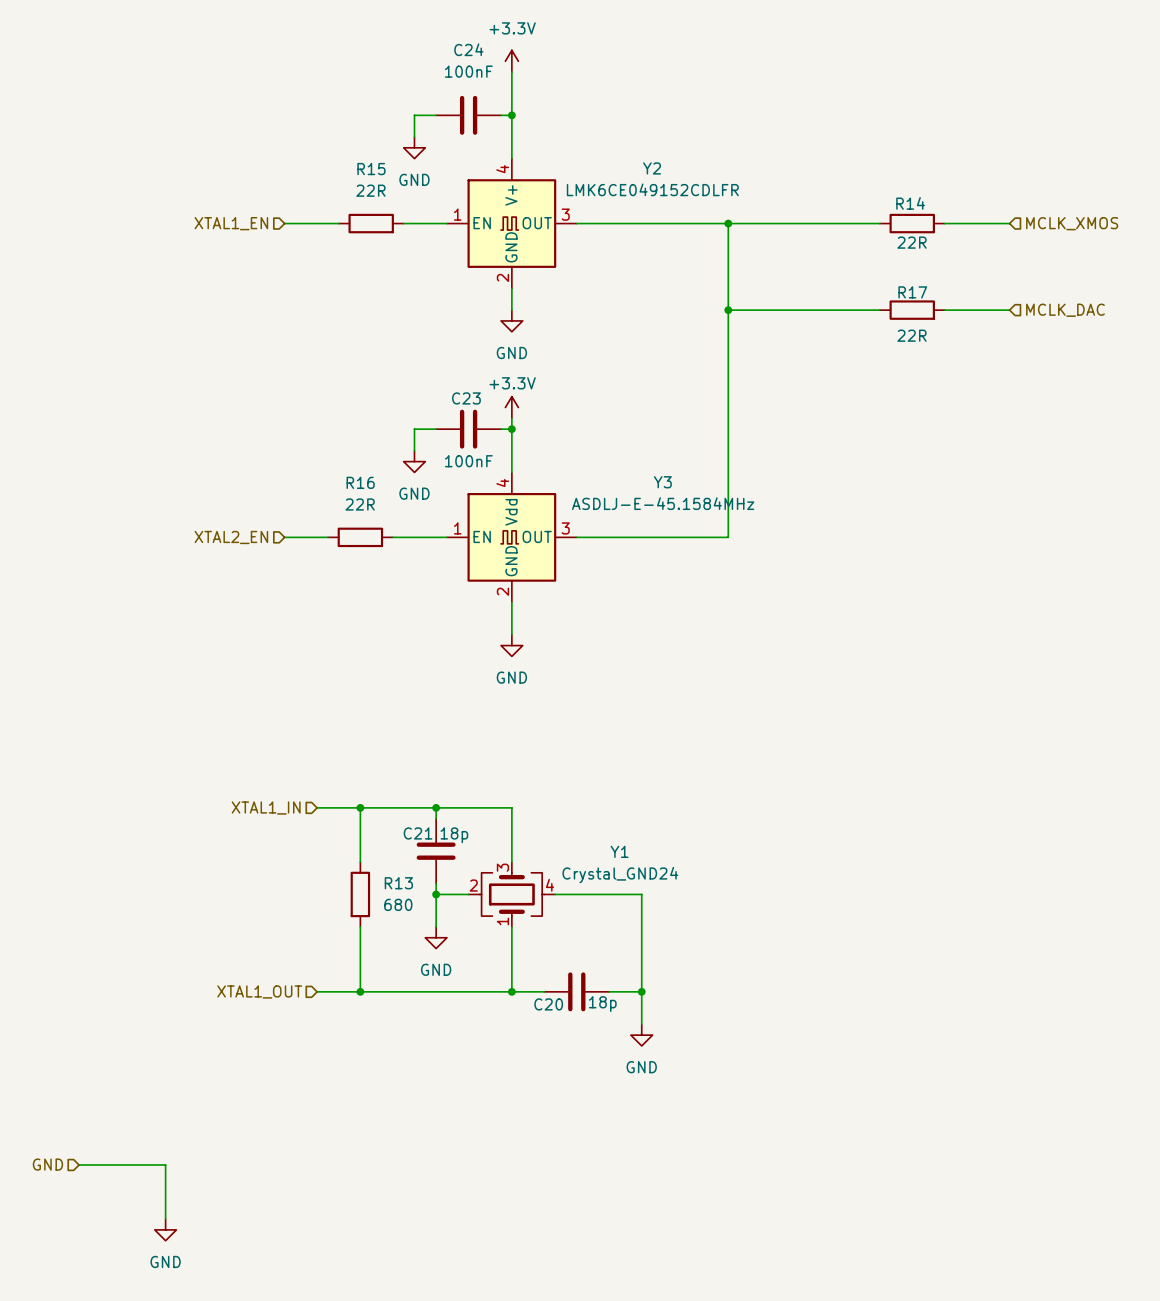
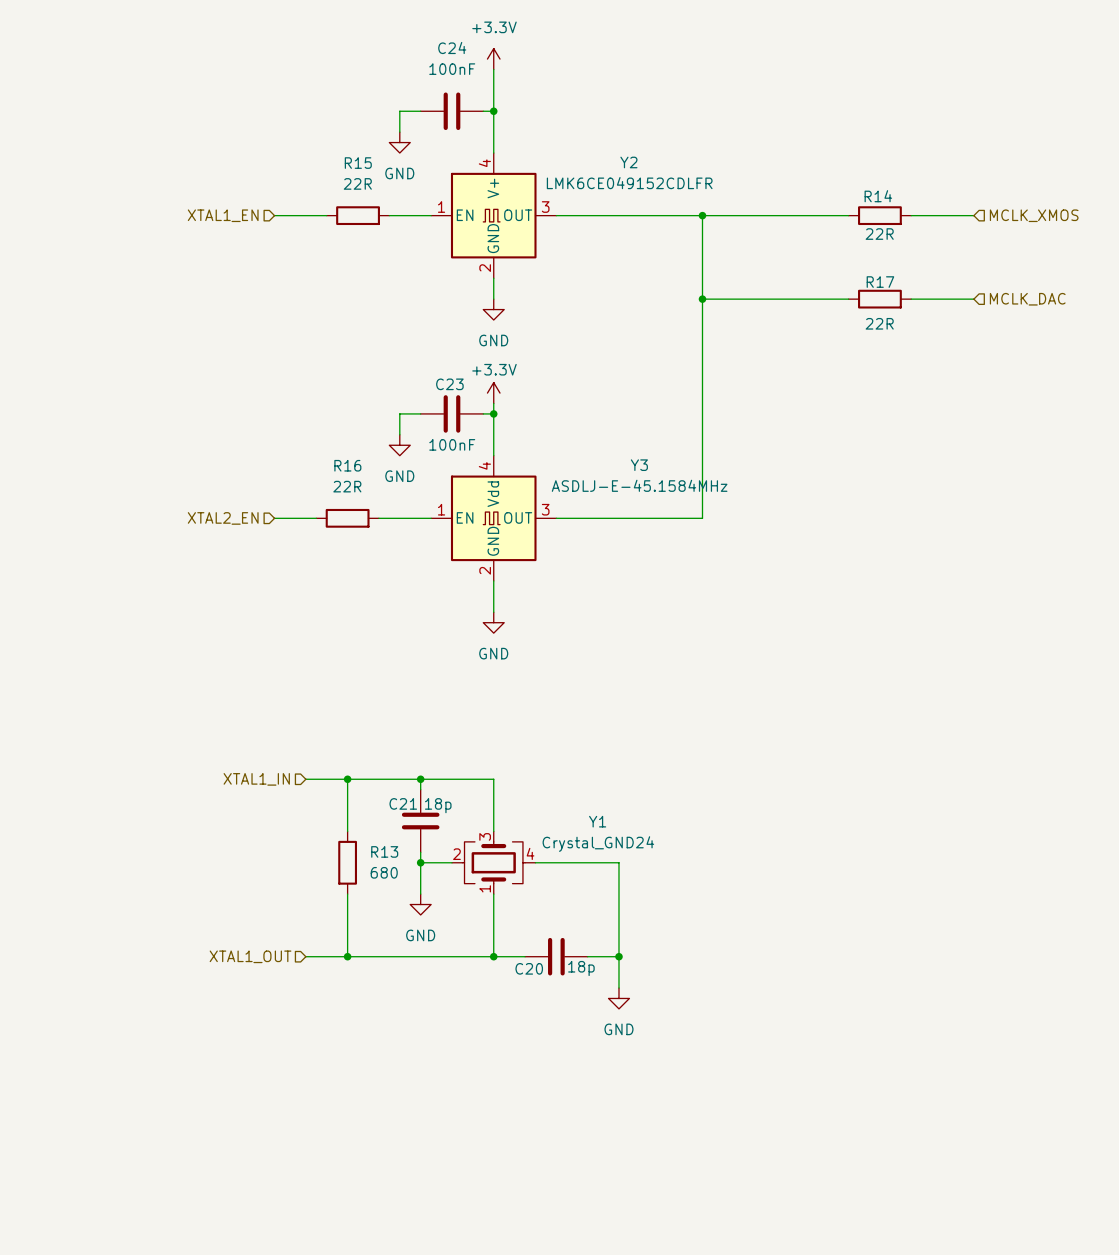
hierarchical label: GND (47, 1164) -> none
wire: (79, 1164) (165, 1164) (165, 1219) -> none
power symbol: GND (165, 1229) -> none

